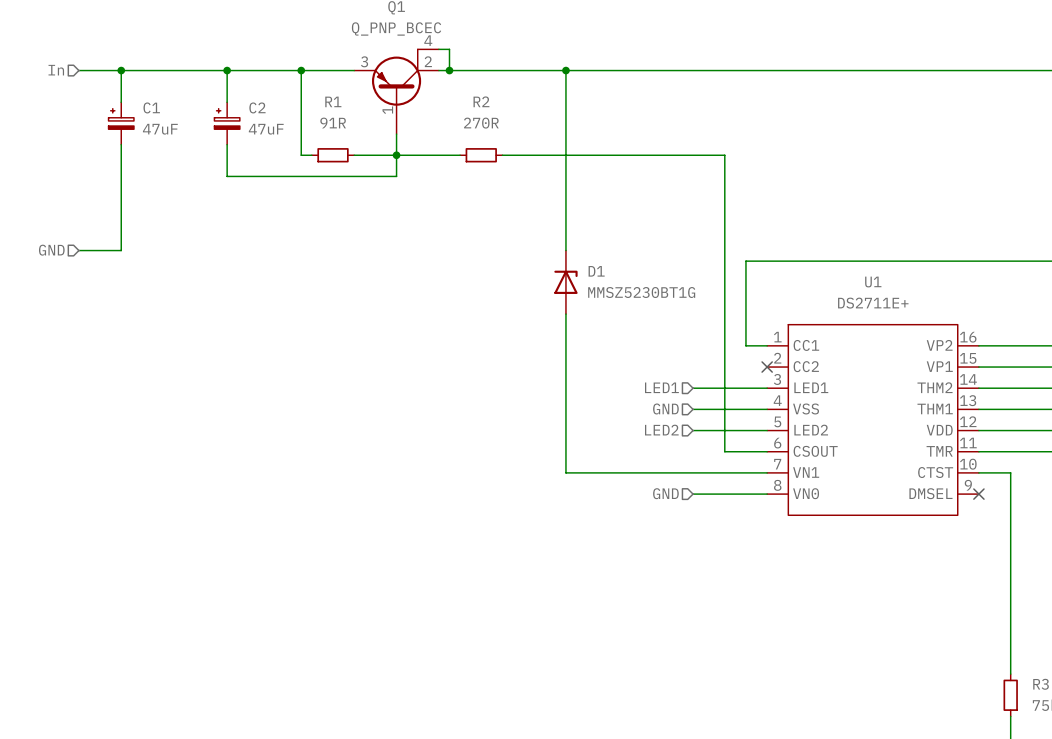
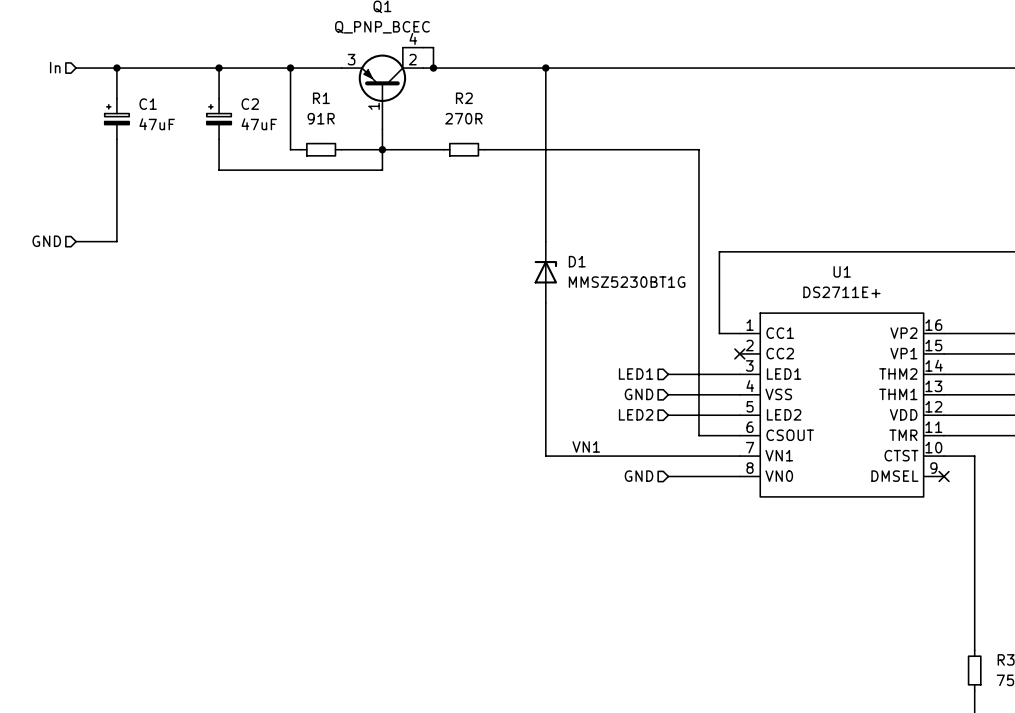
label: none -> VN1 (586, 446)

